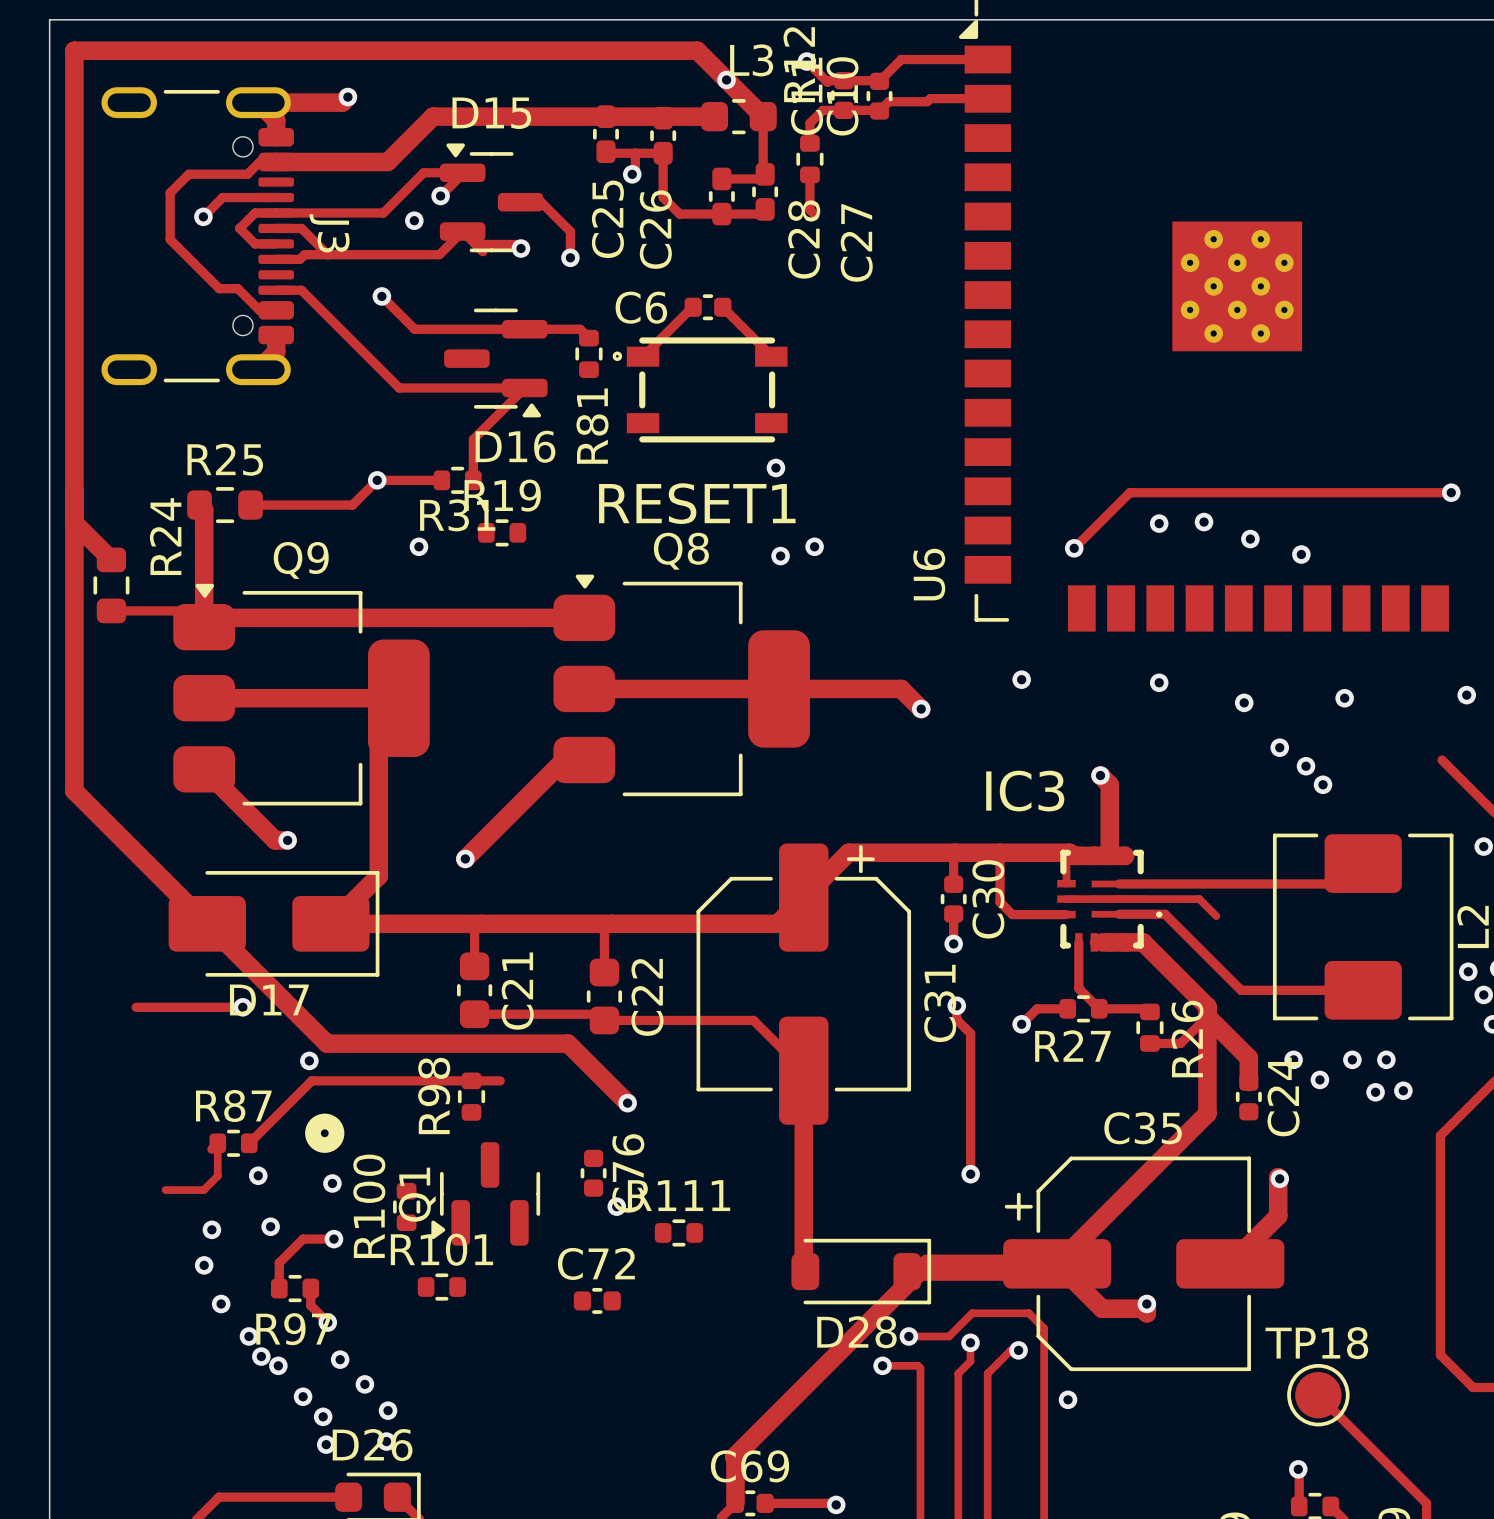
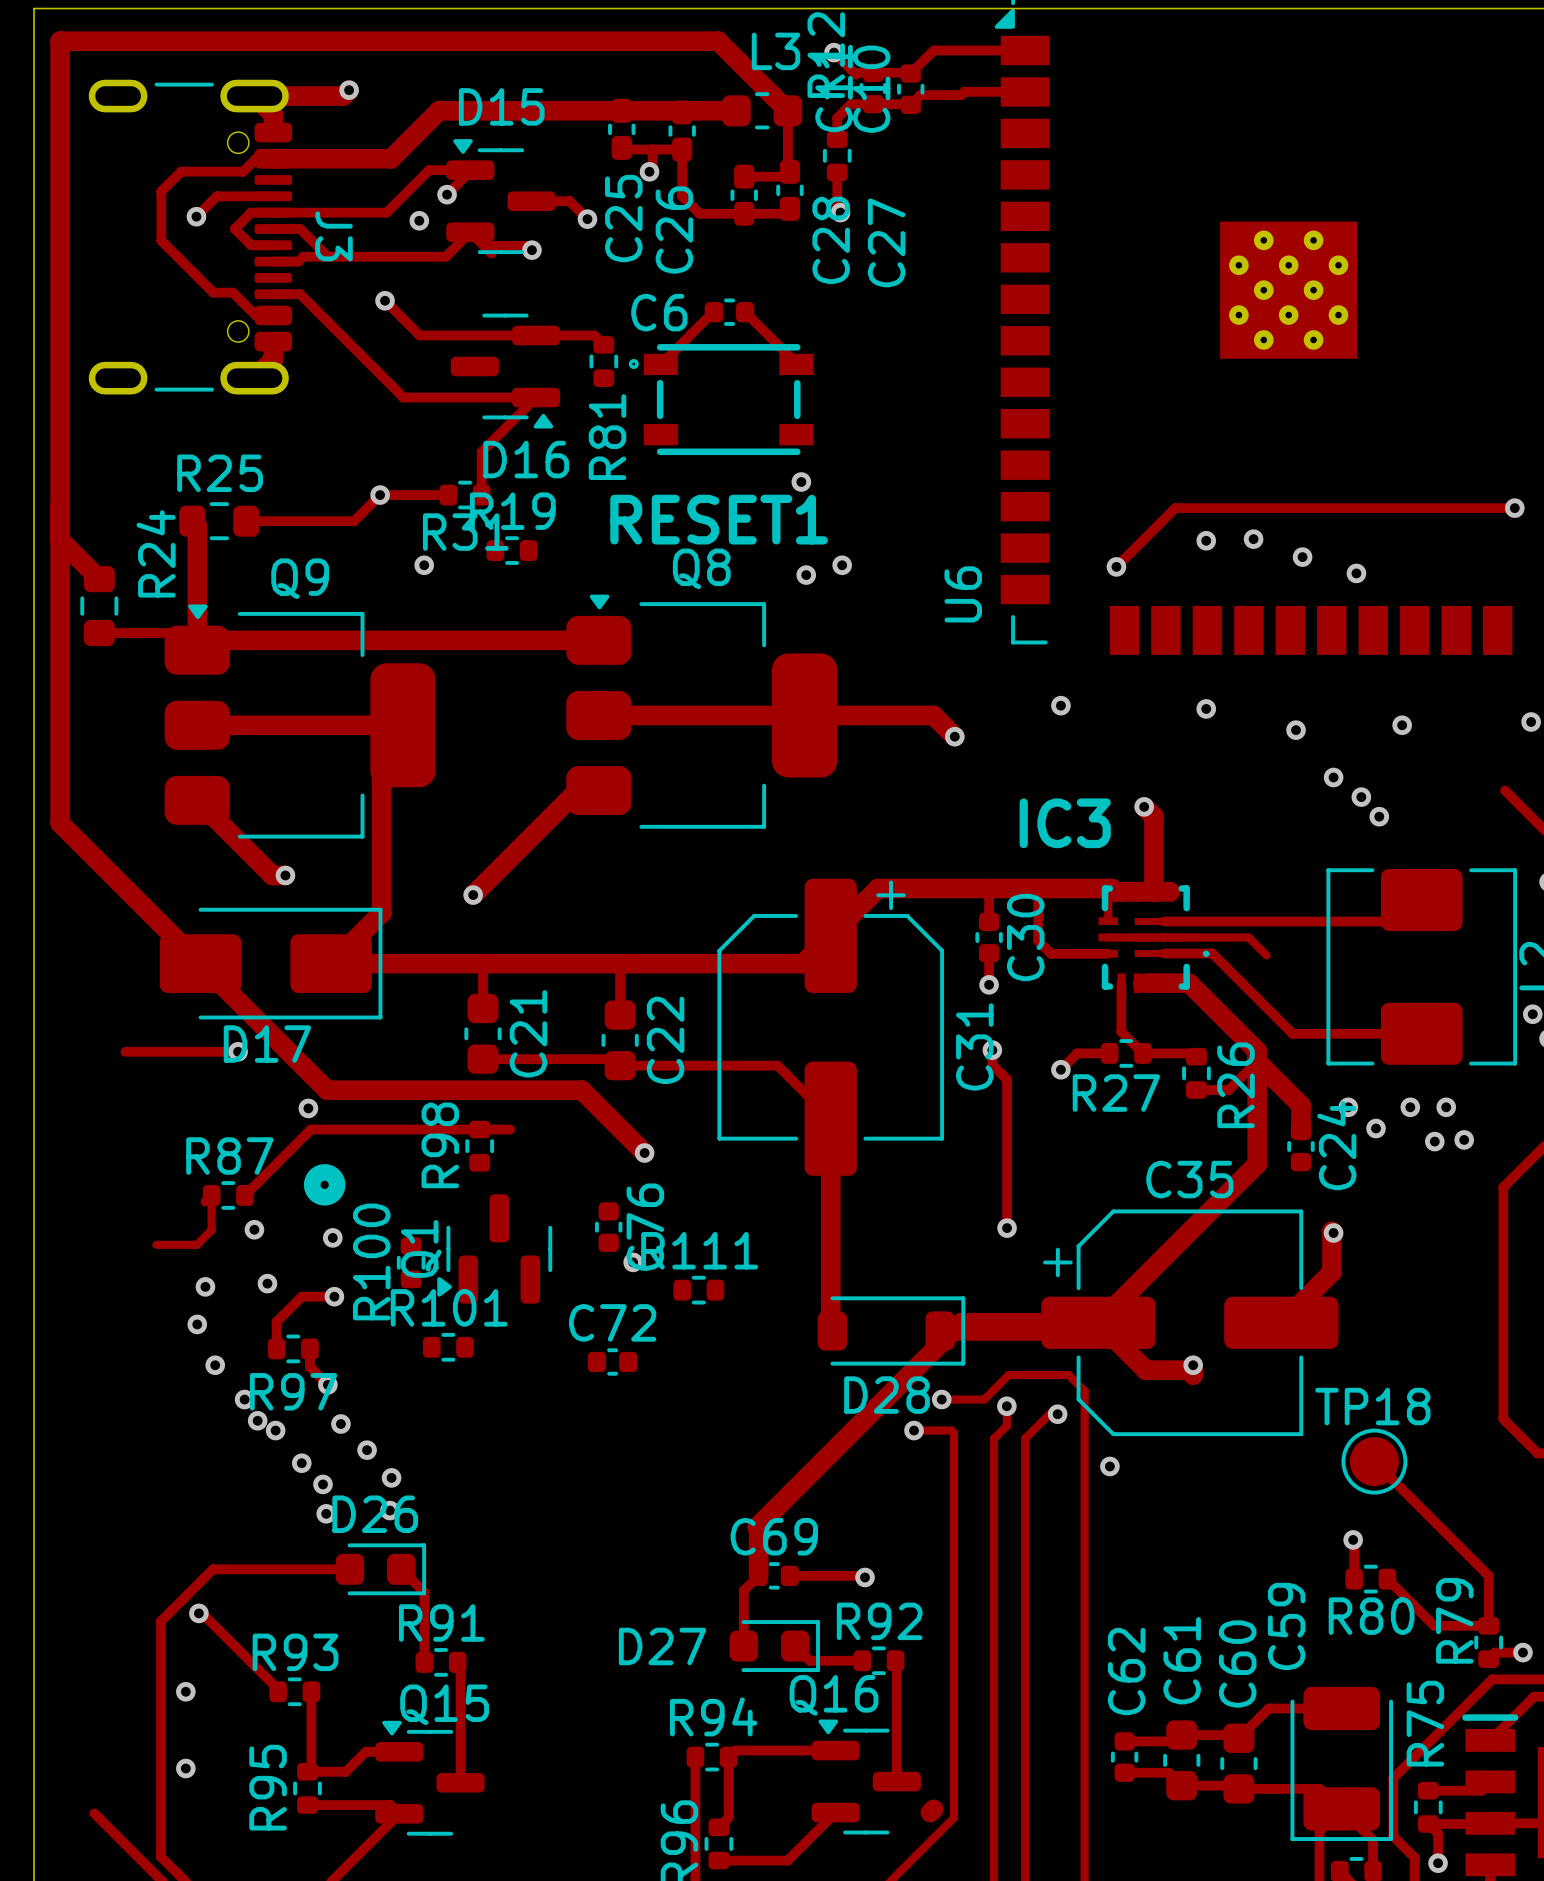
via: (726, 80) -> none
track: (541, 202) (570, 231) (570, 257) -> (553, 201) (569, 201) (587, 219)
via: none -> (840, 212)
via position: (570, 257) -> (587, 219)

